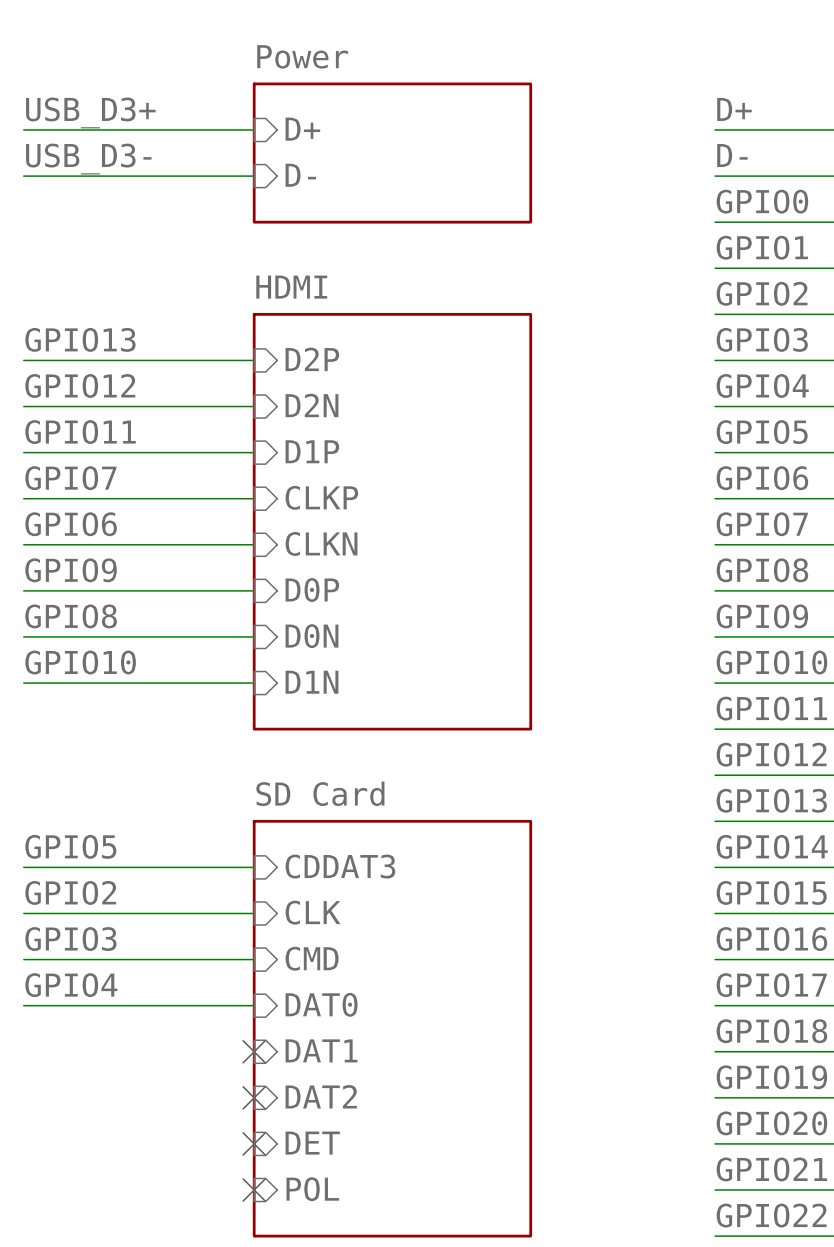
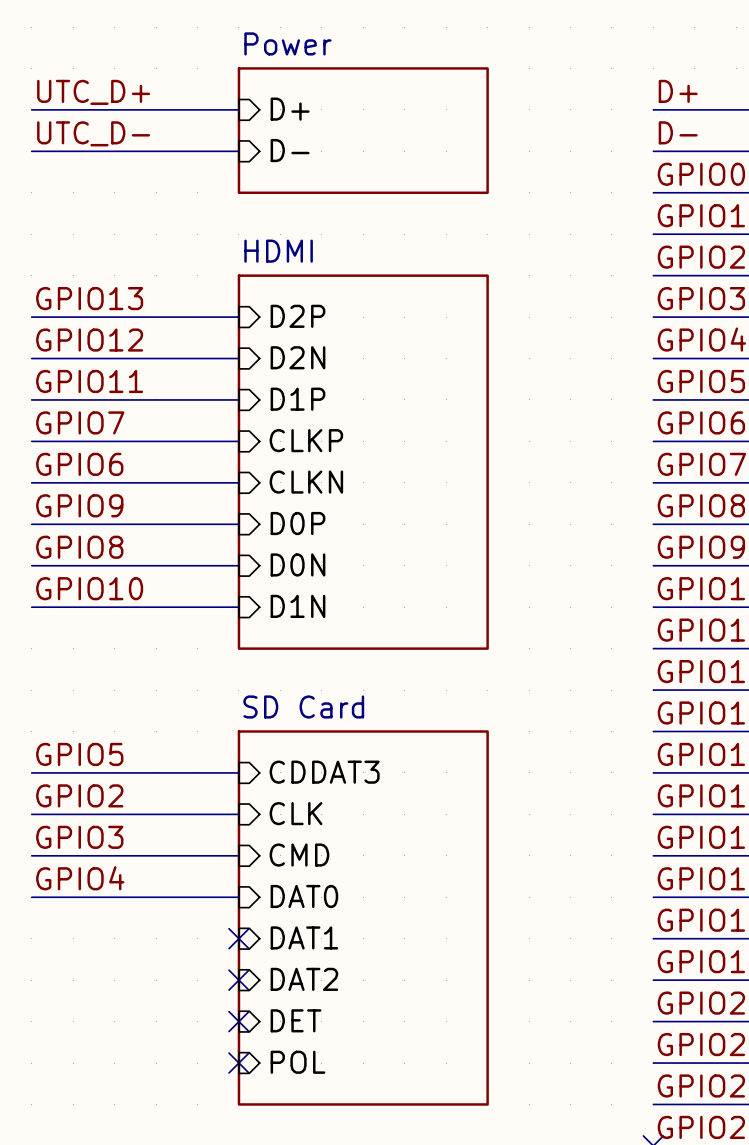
label: USB_D3+ (90, 112) -> UTC_D+ (93, 92)
label: USB_D3- (88, 159) -> UTC_D- (93, 133)

